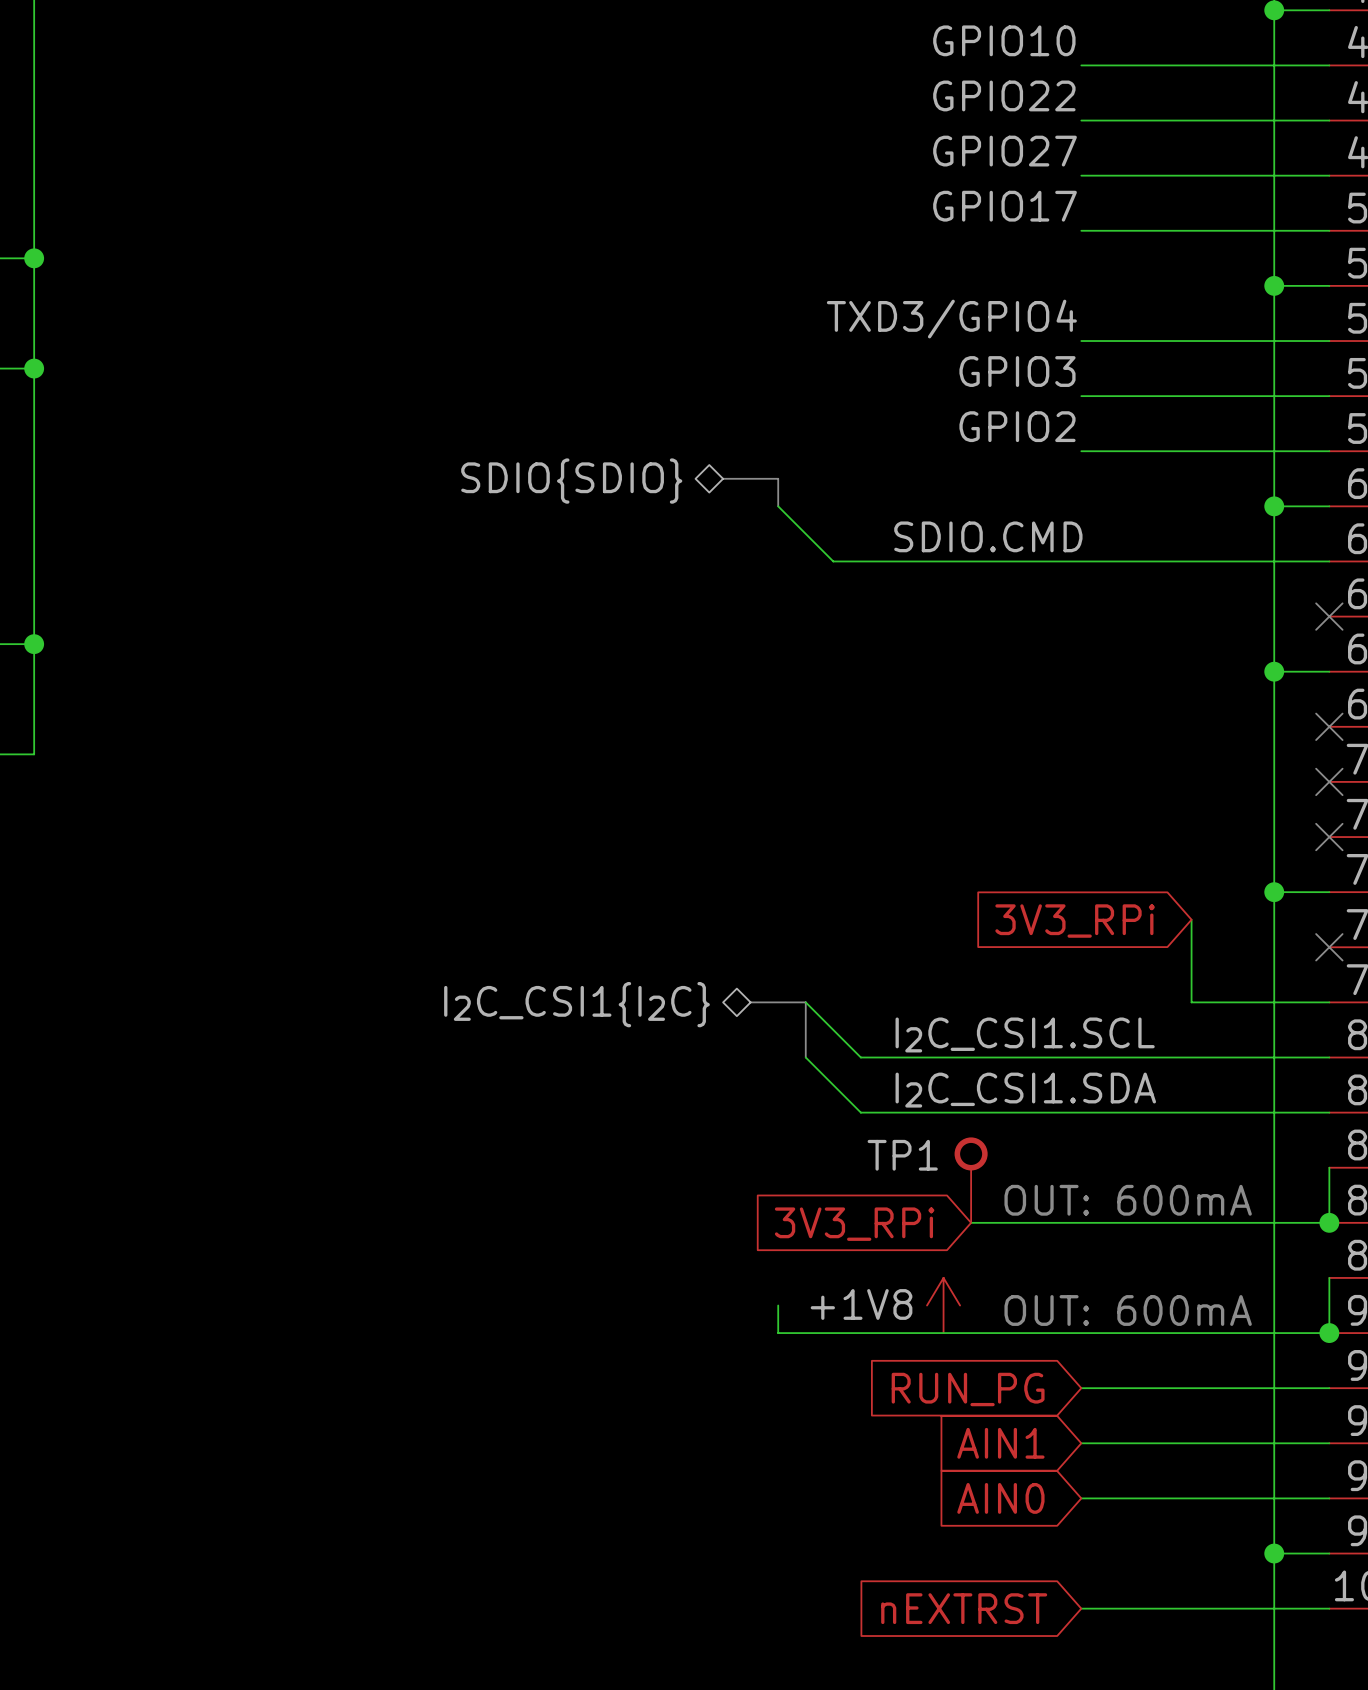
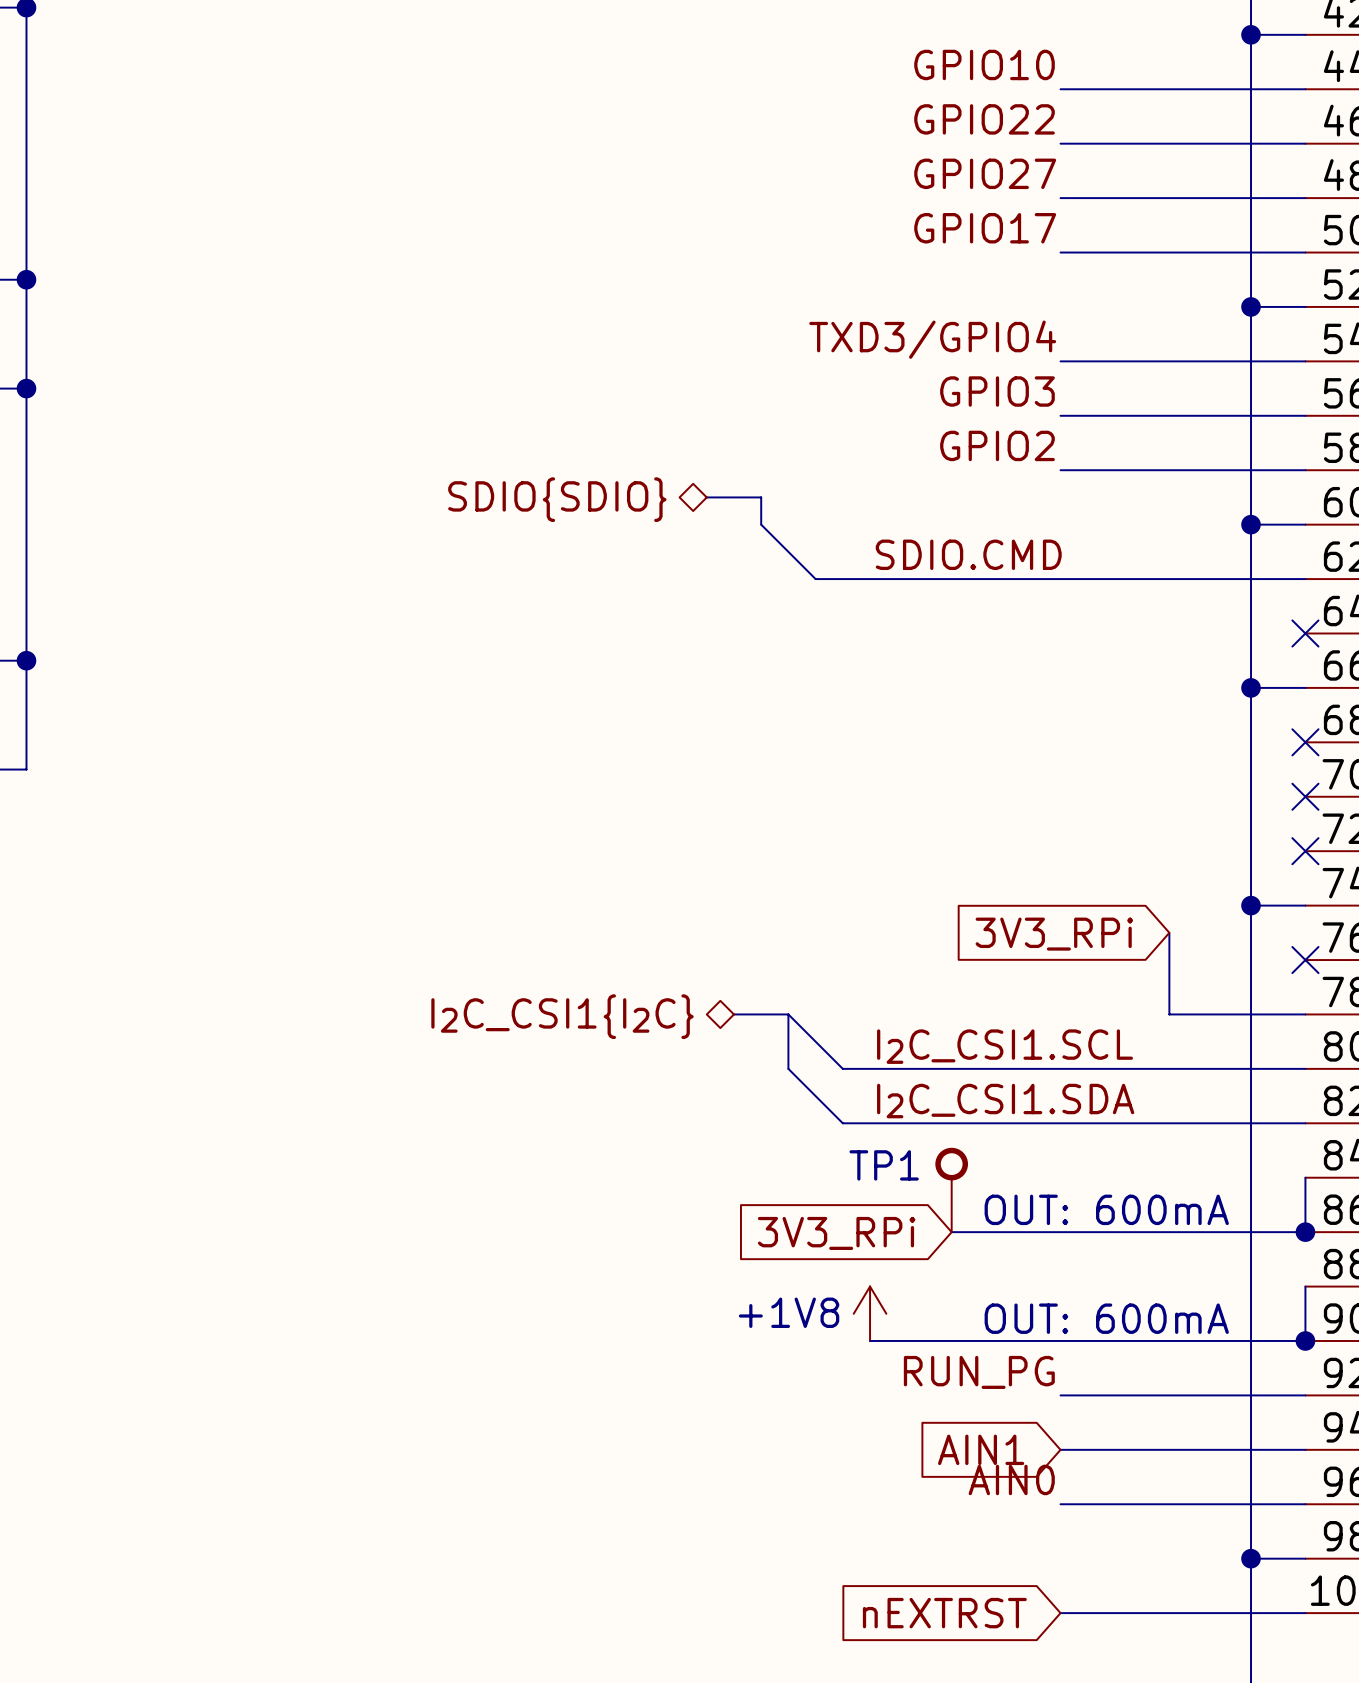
wire: (778, 1305) (778, 1333) (888, 1333) -> none
power symbol position: +1V8 (943, 1305) -> +1V8 (870, 1313)
label: none -> RUN_PG (979, 1372)
global label: RUN_PG (968, 1389) -> none
label: none -> AIN0 (1011, 1479)
global label: AIN0 (1000, 1498) -> none

